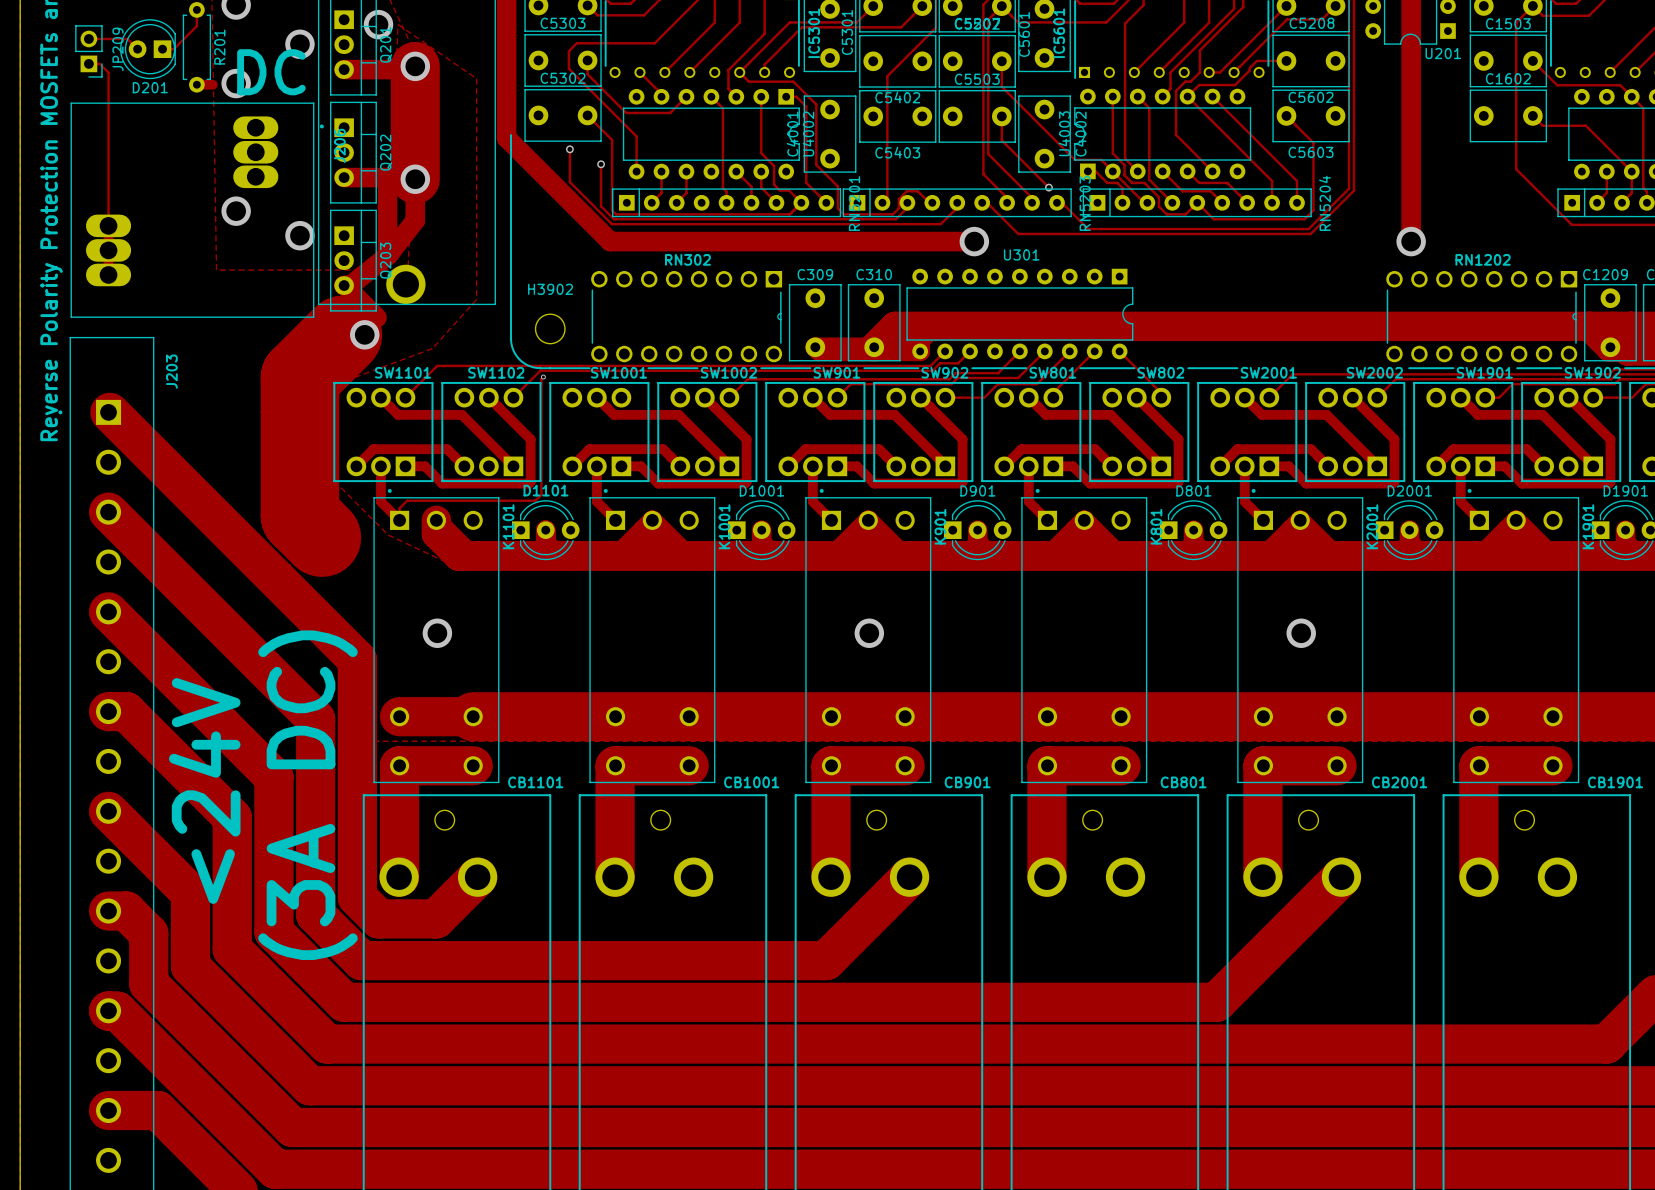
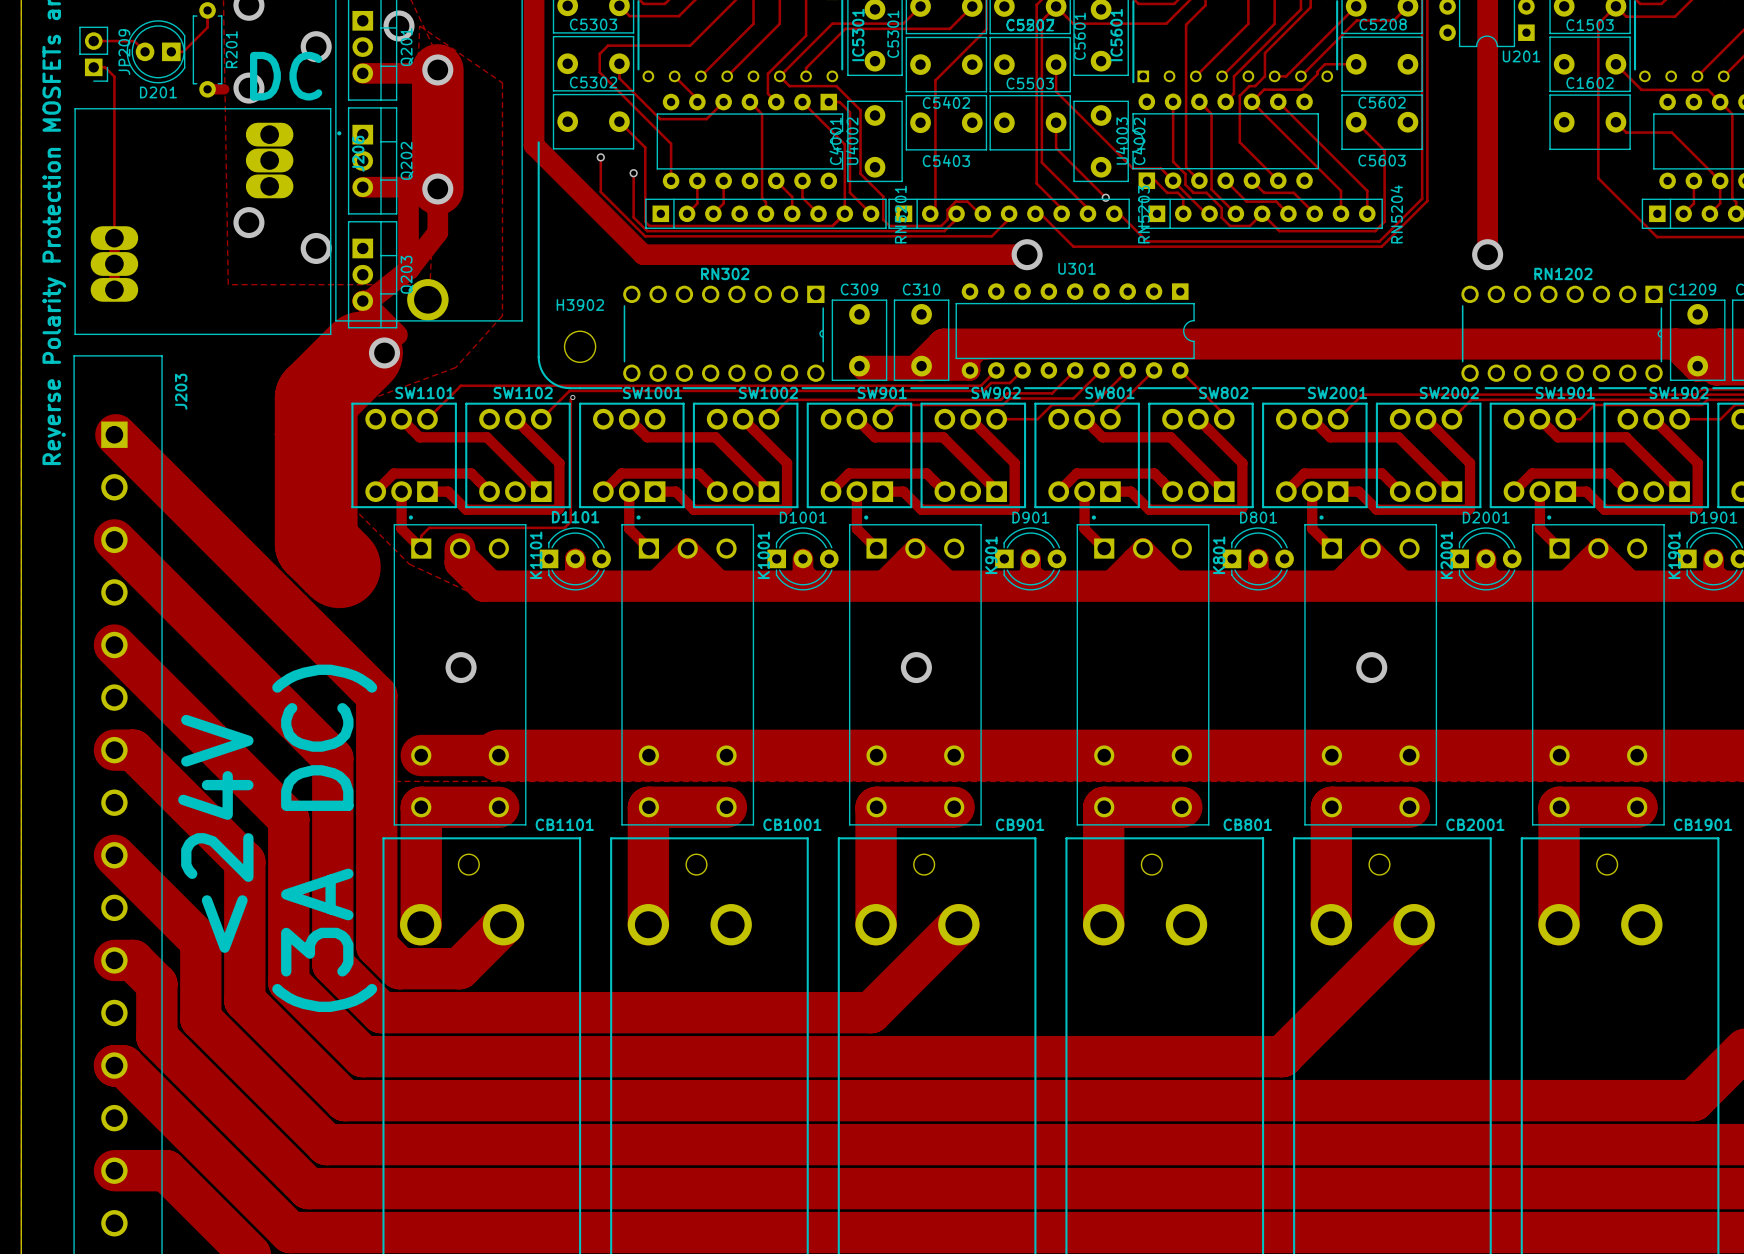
track: (761, 96) (761, 153) (774, 166) (774, 184) (779, 190) (789, 190) (801, 202) -> (802, 102) (844, 144) (844, 213)

